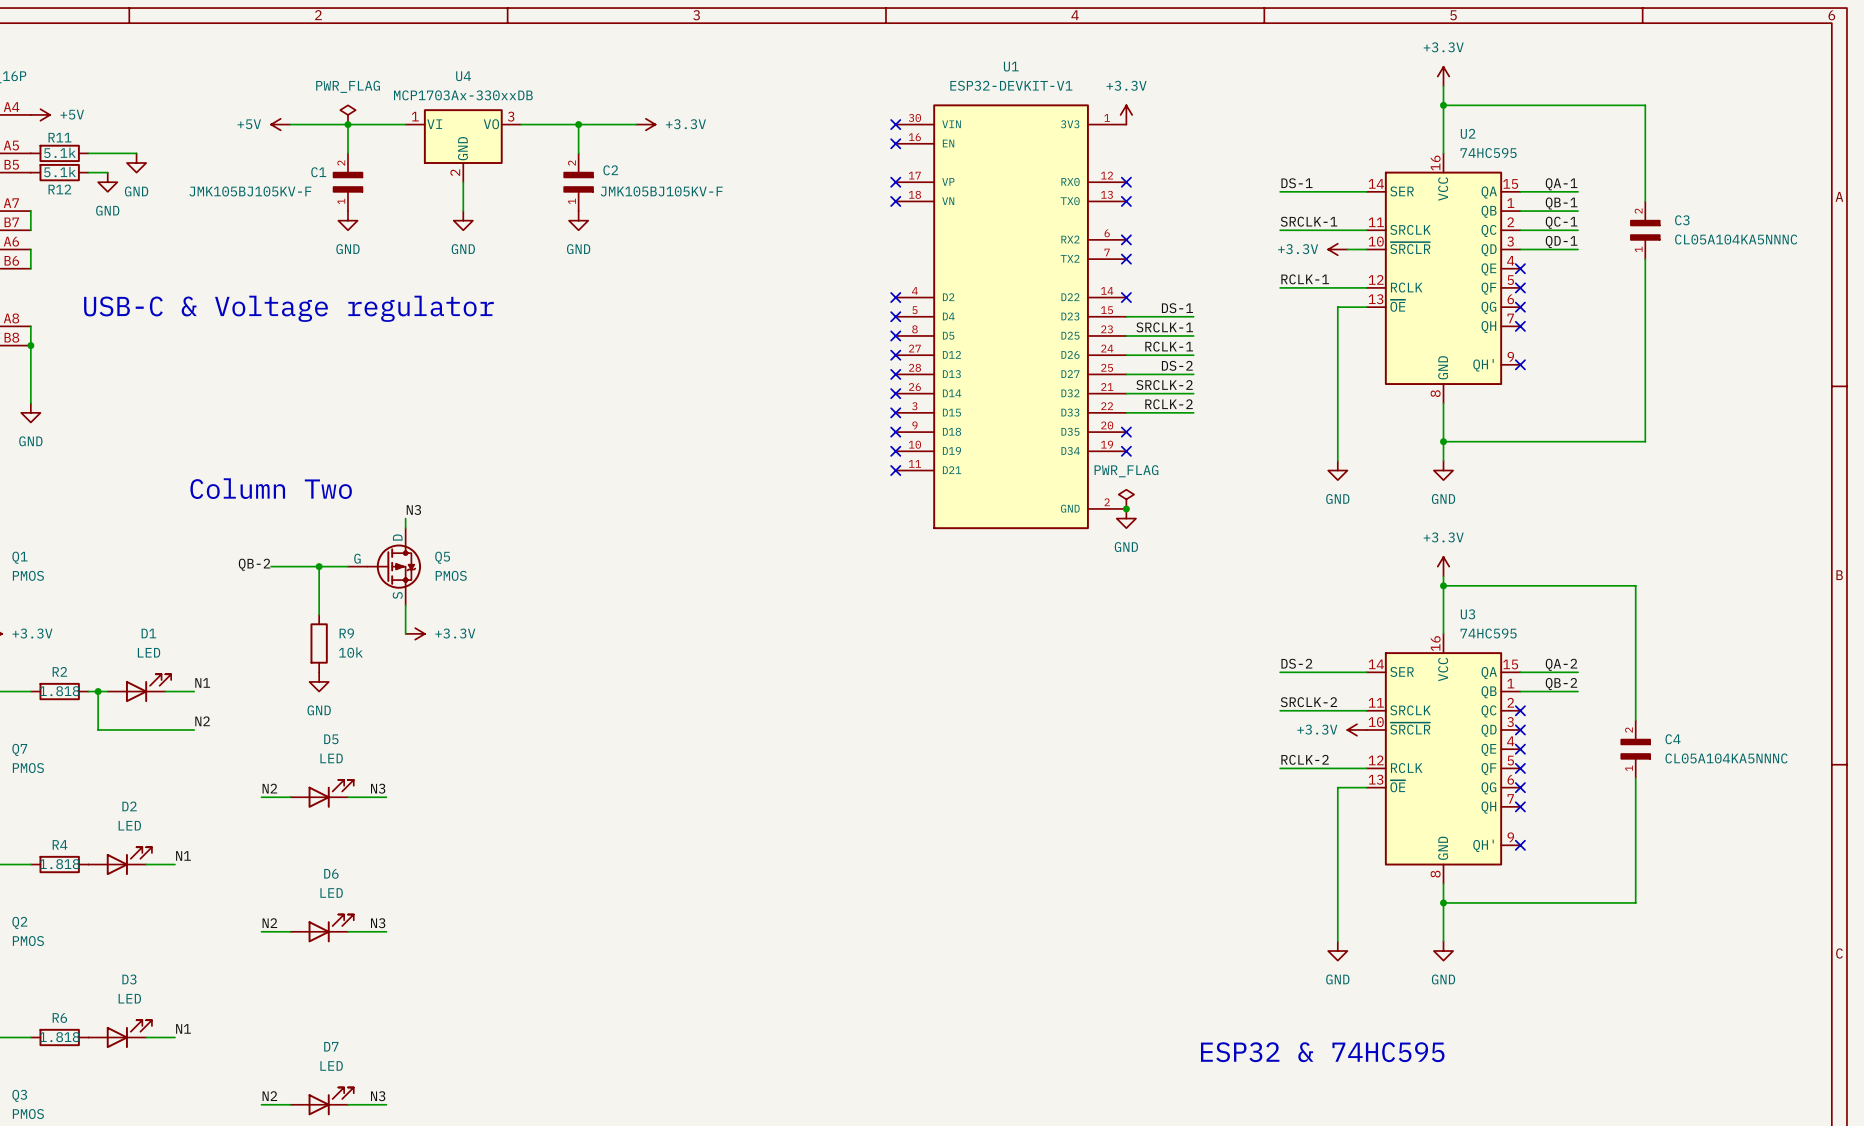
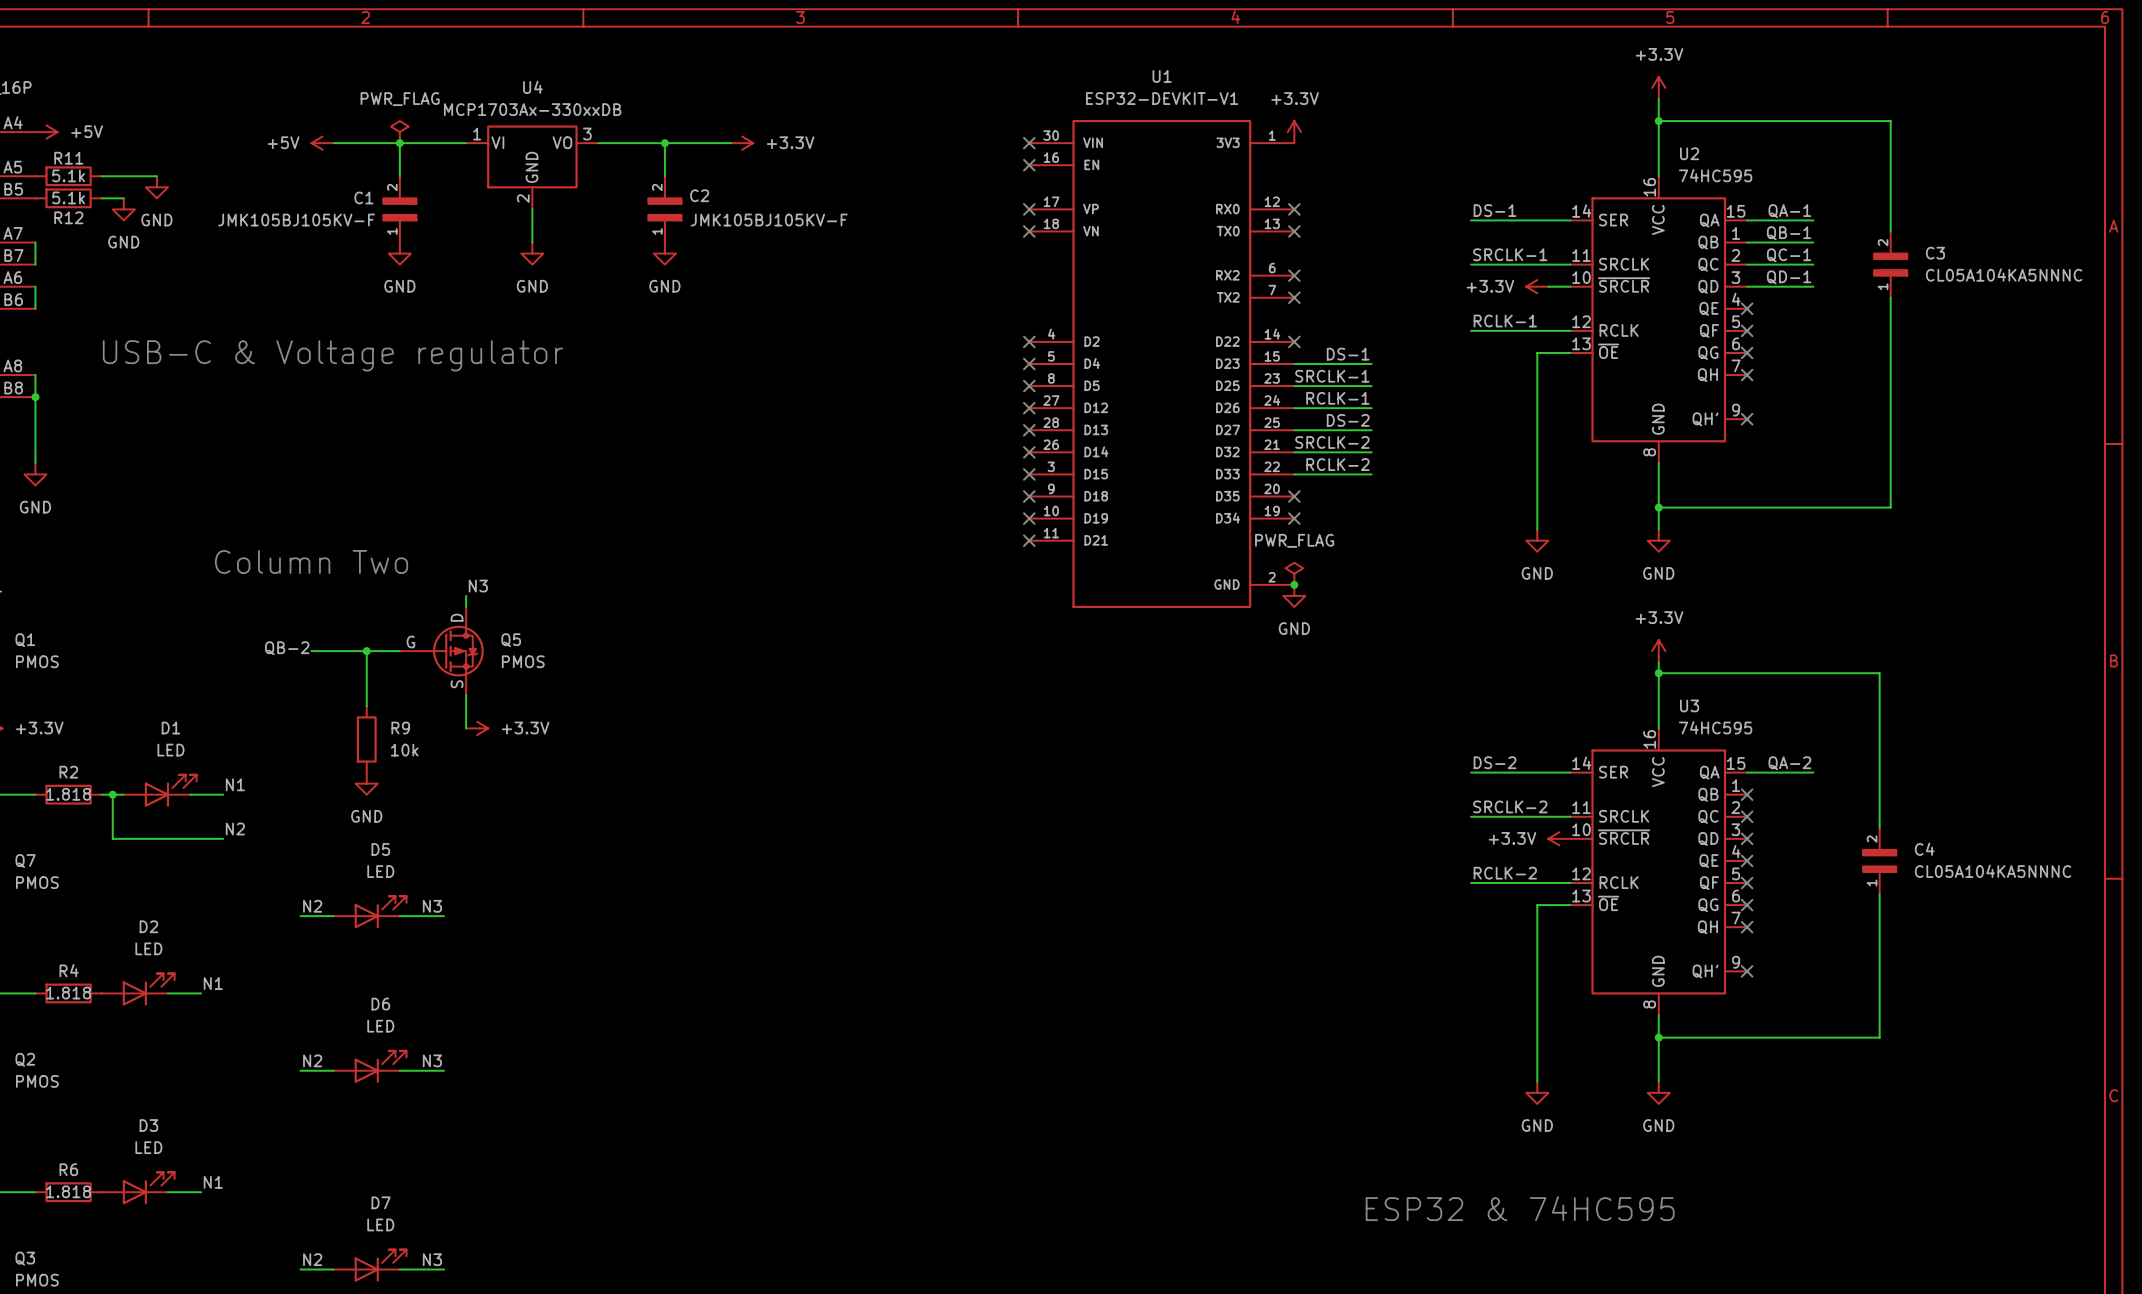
label: QB-2 (1561, 684) -> none
wire: (1520, 691) (1578, 691) -> none
no-connect mark: none -> (1747, 794)

